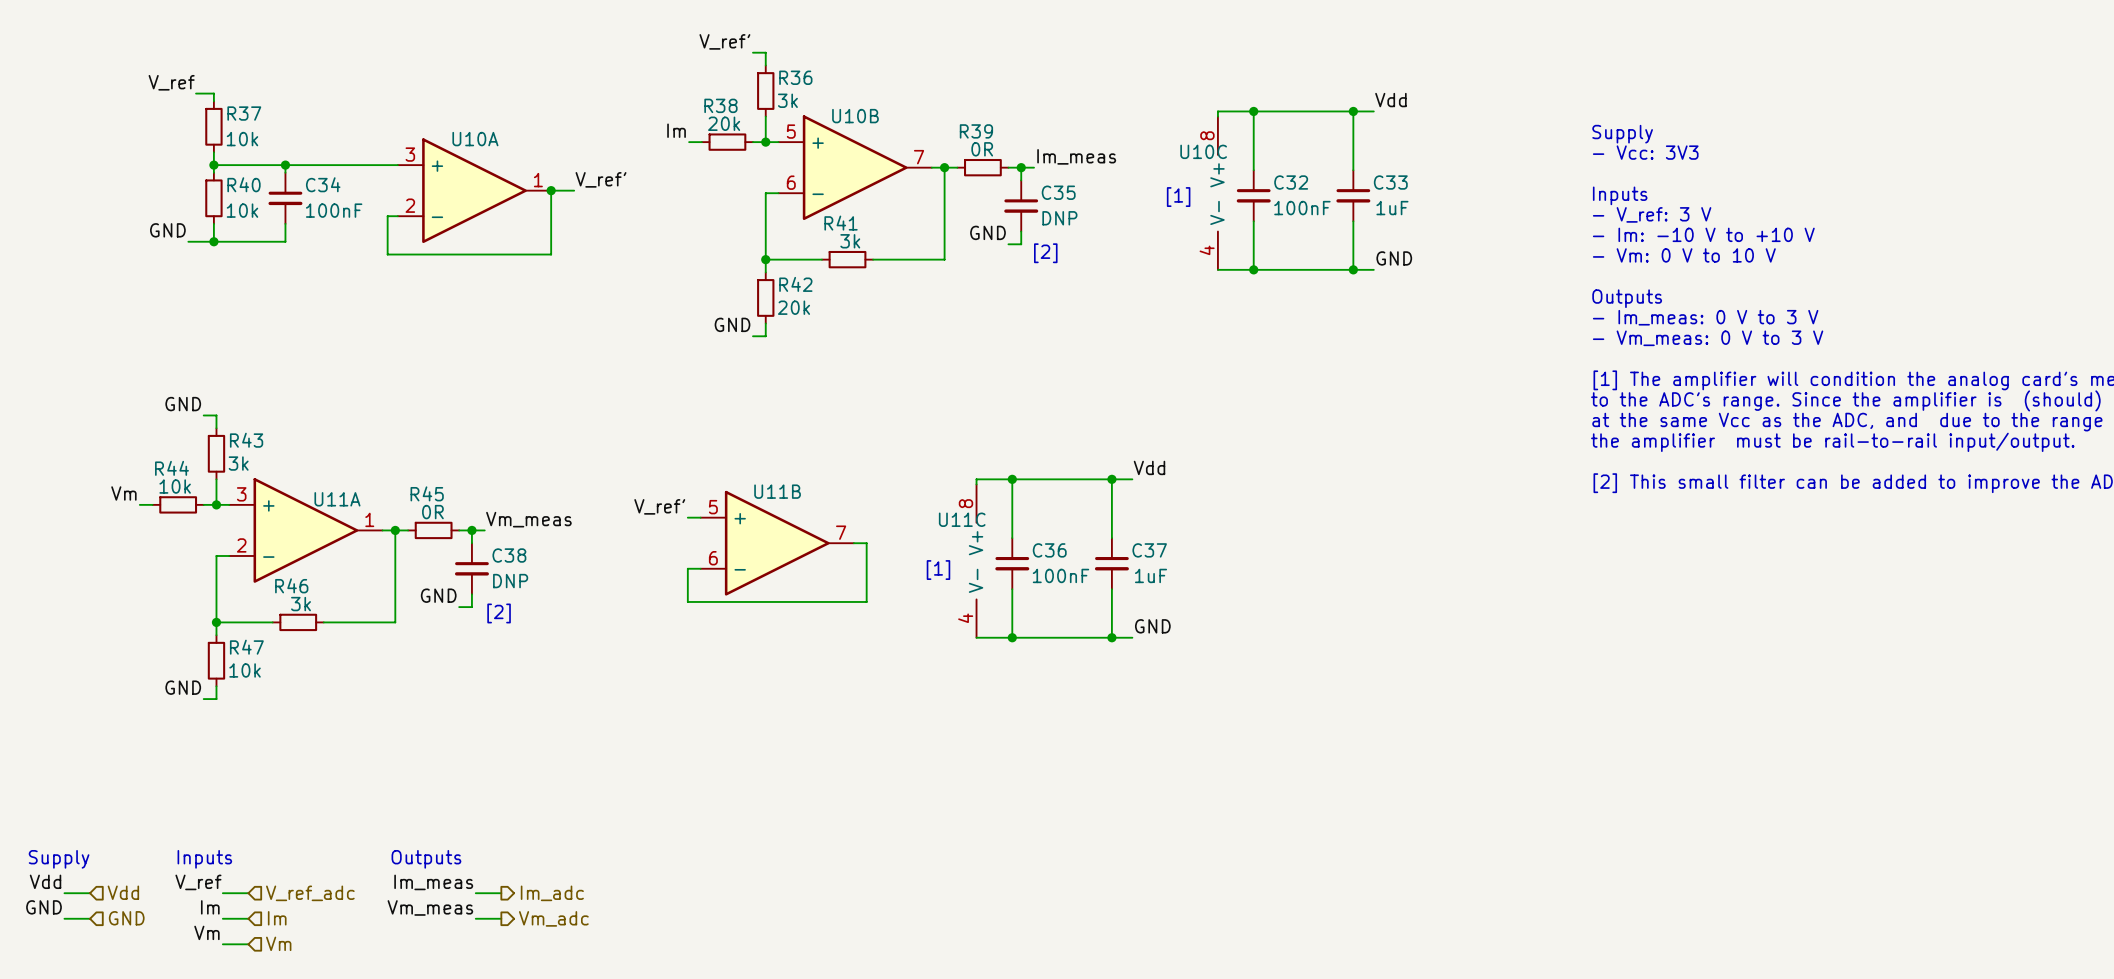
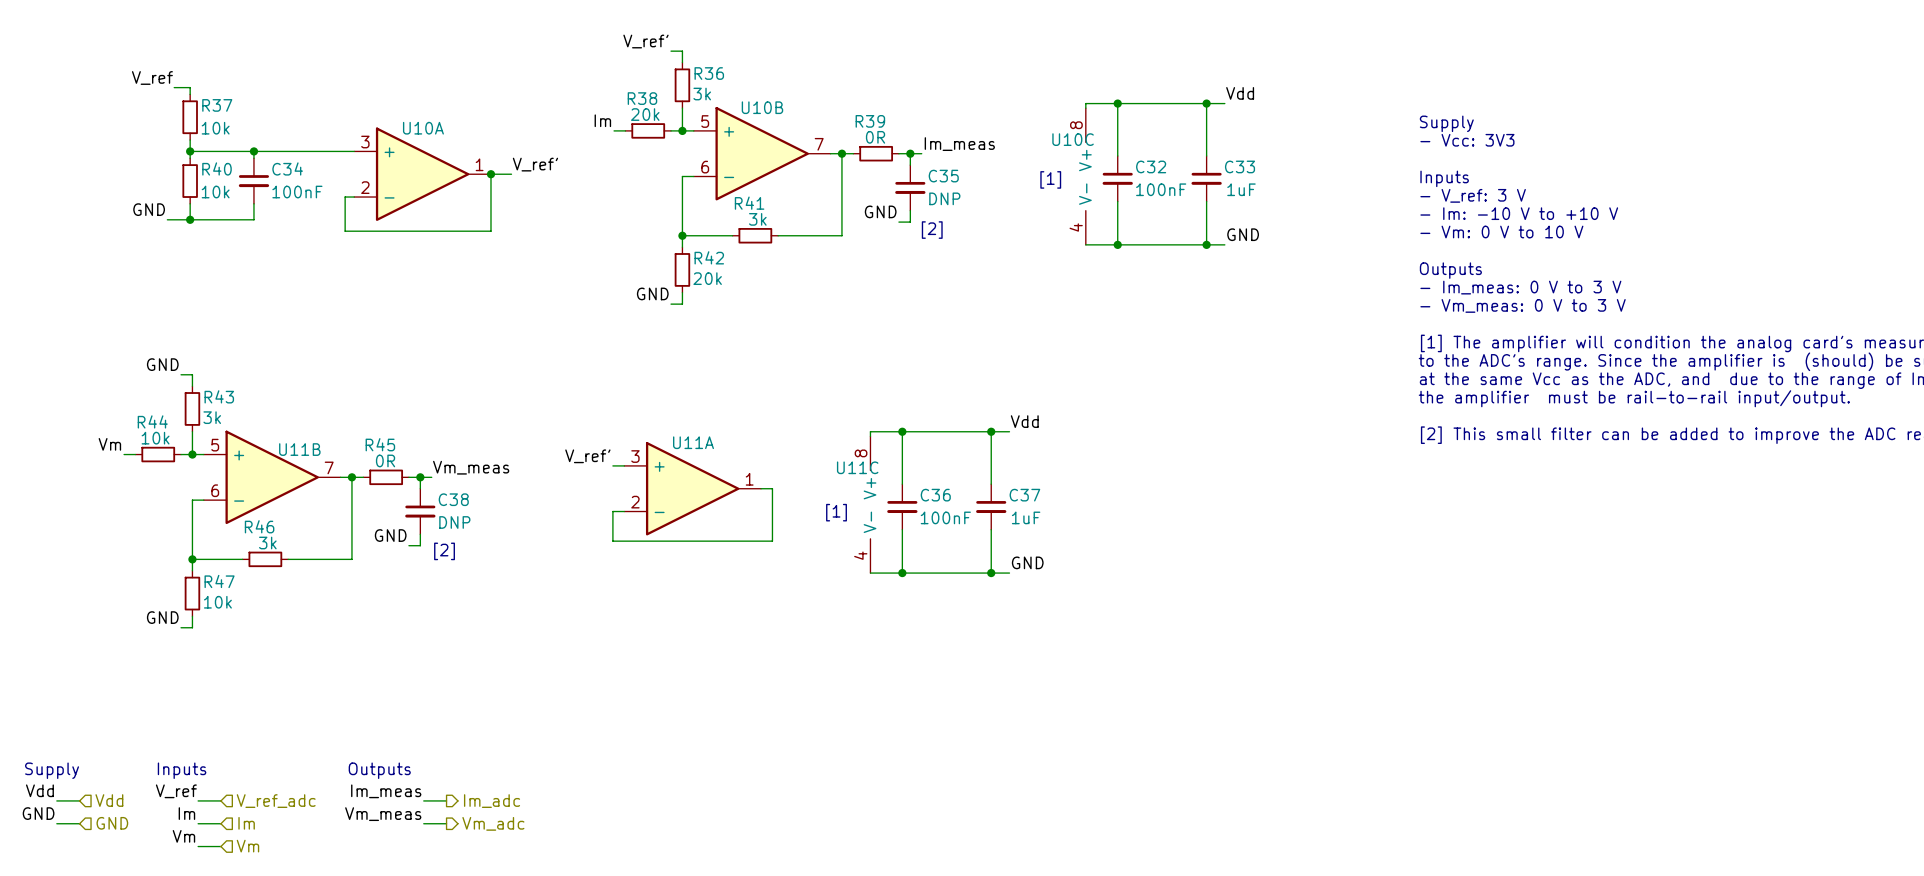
U11B name position: U11B (777, 491) -> U11B (299, 449)
U11A name position: U11A (337, 499) -> U11A (693, 442)
U11A position: (305, 530) -> (692, 488)
U11B position: (777, 543) -> (272, 477)

